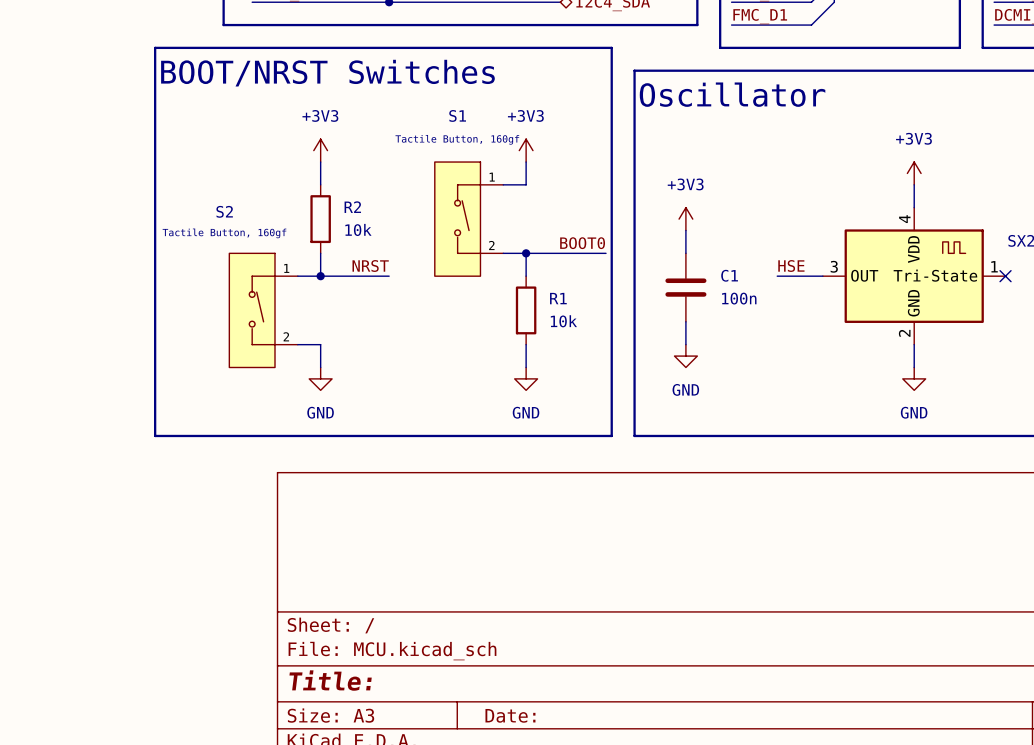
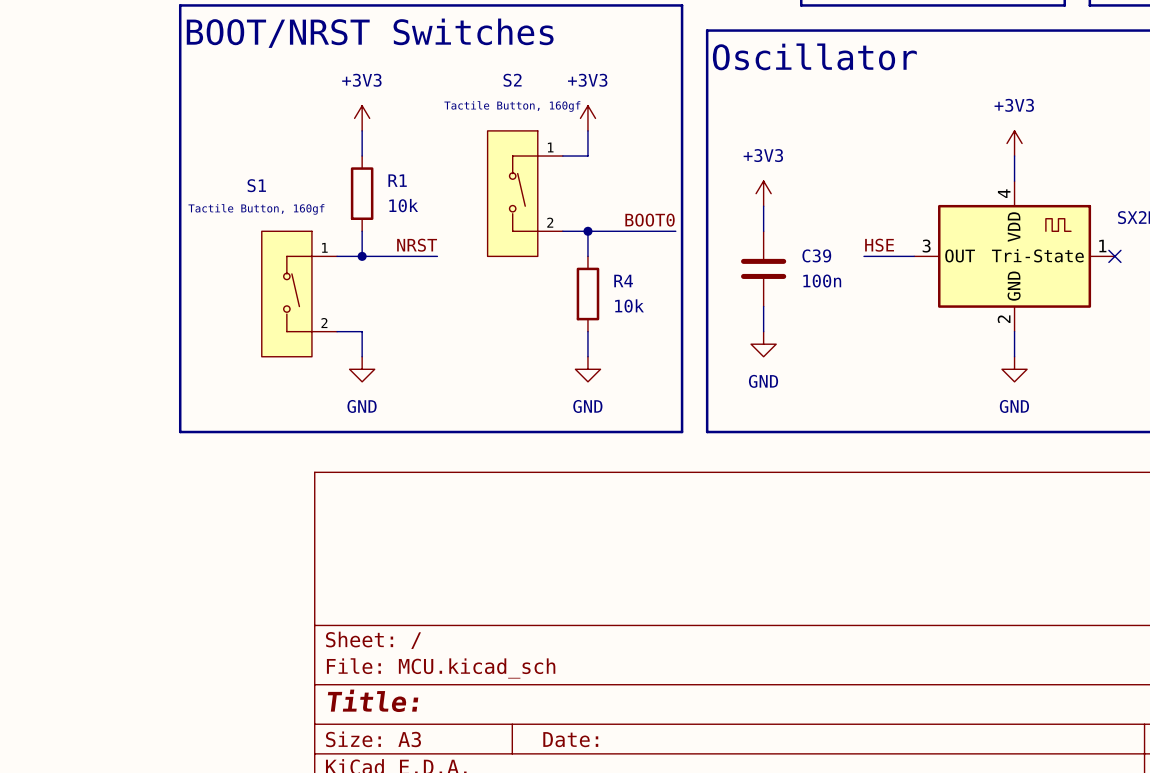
S1 name: S1 (457, 115) -> S2 (512, 80)
R2 name: R2 (352, 207) -> R1 (397, 180)
S2 name: S2 (224, 211) -> S1 (256, 185)
C1 name: C1 (729, 275) -> C39 (816, 255)
R1 name: R1 (558, 298) -> R4 (623, 281)

